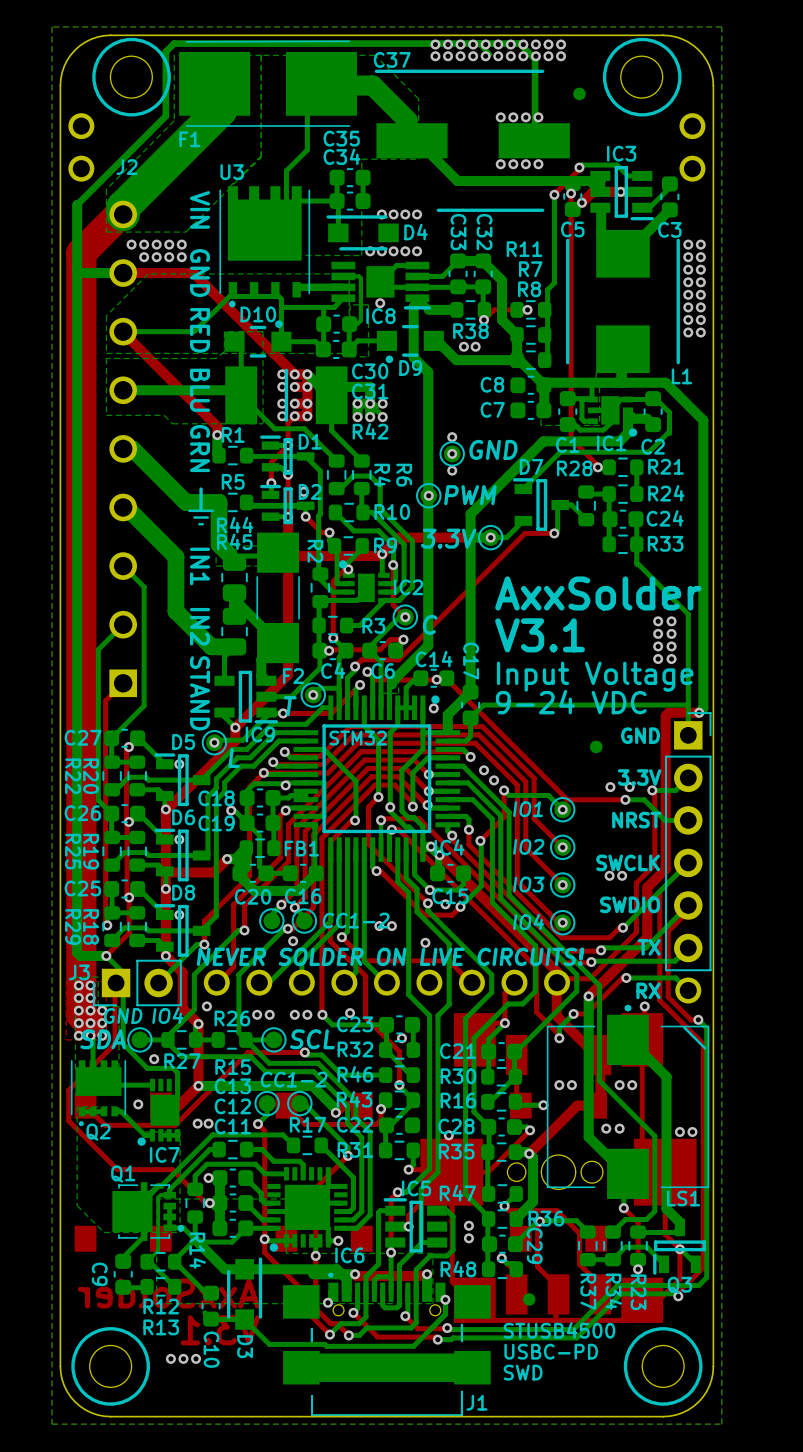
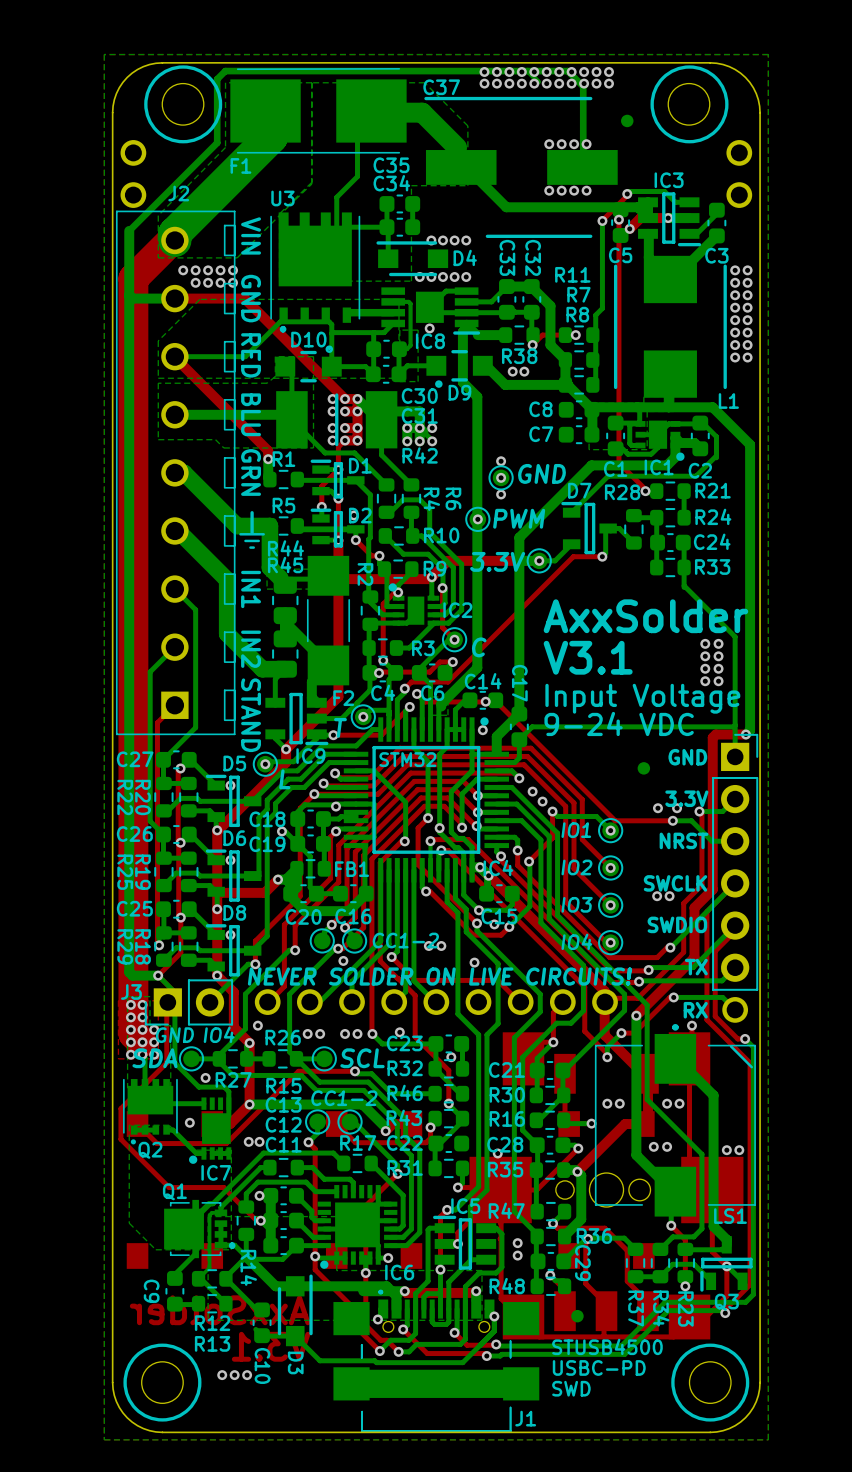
J2 footprint: [109, 200, 138, 698] -> [115, 210, 236, 736]

